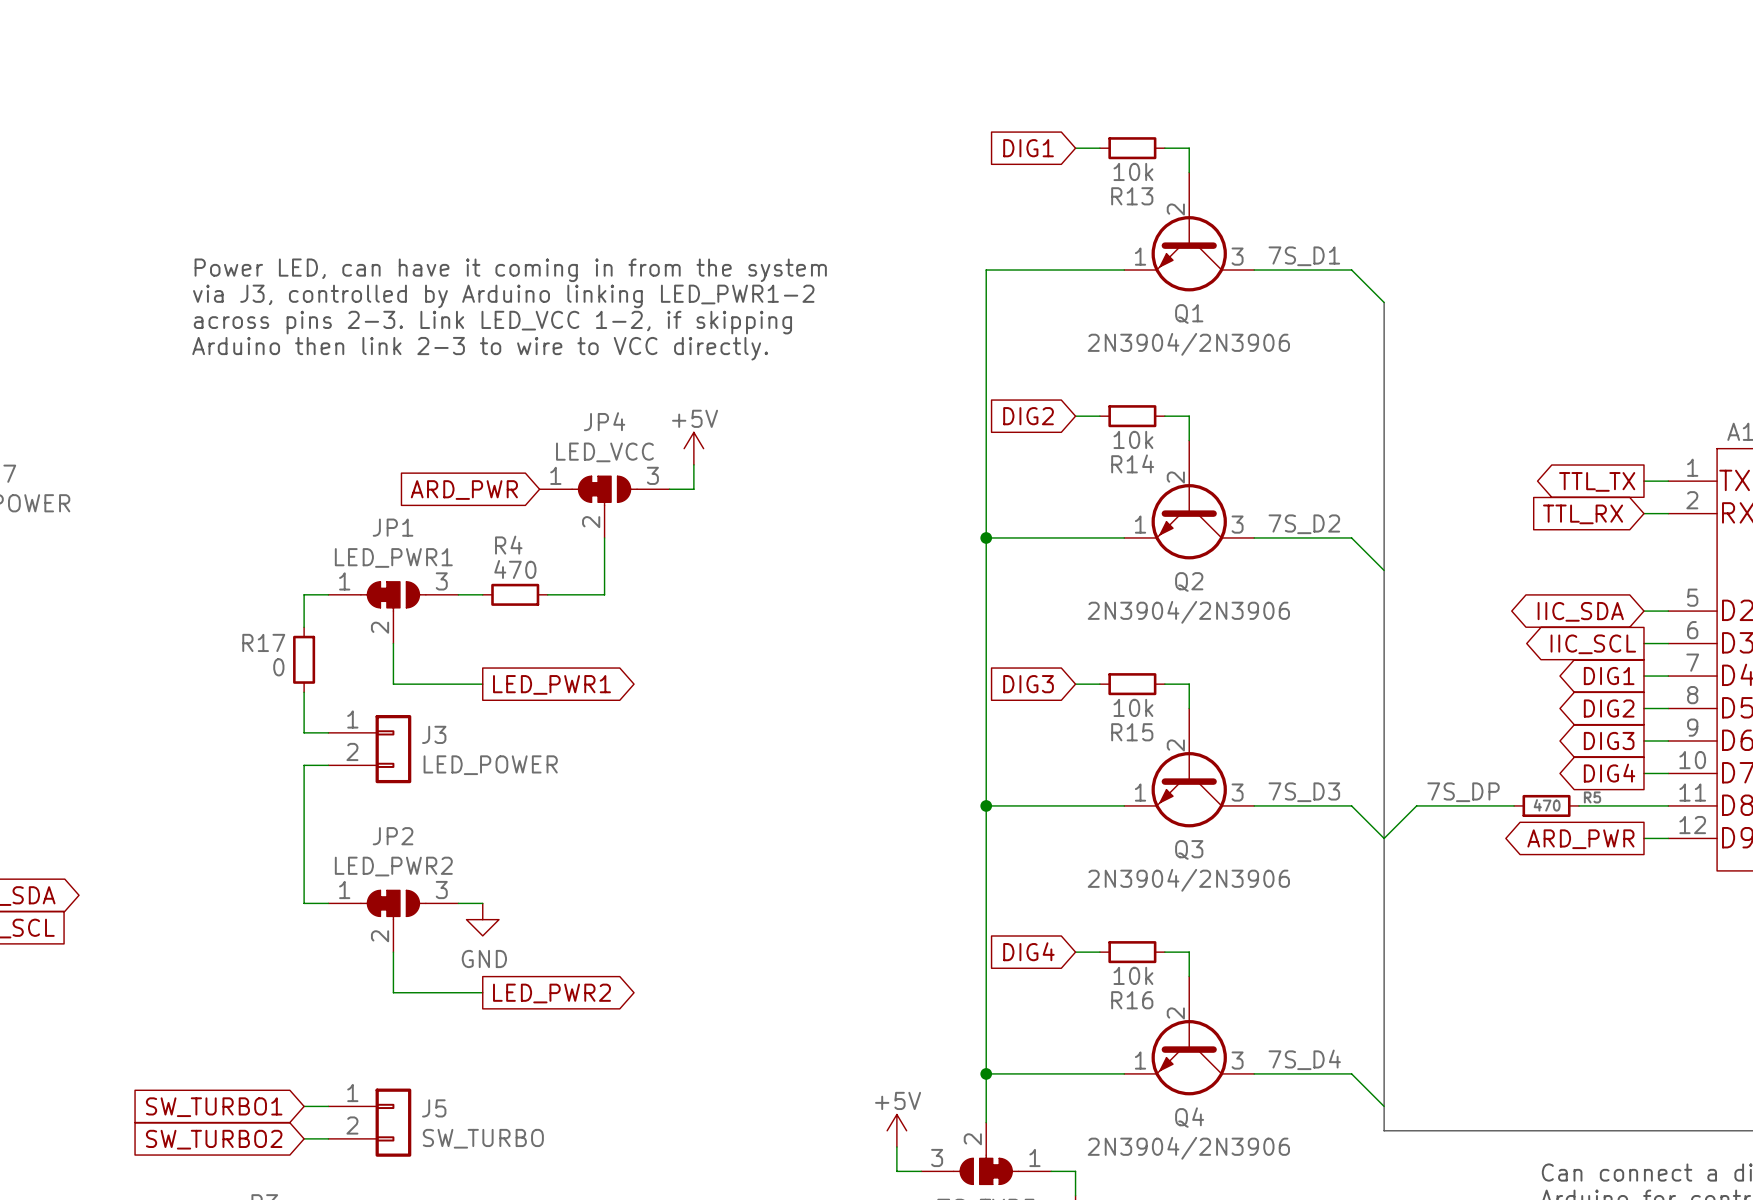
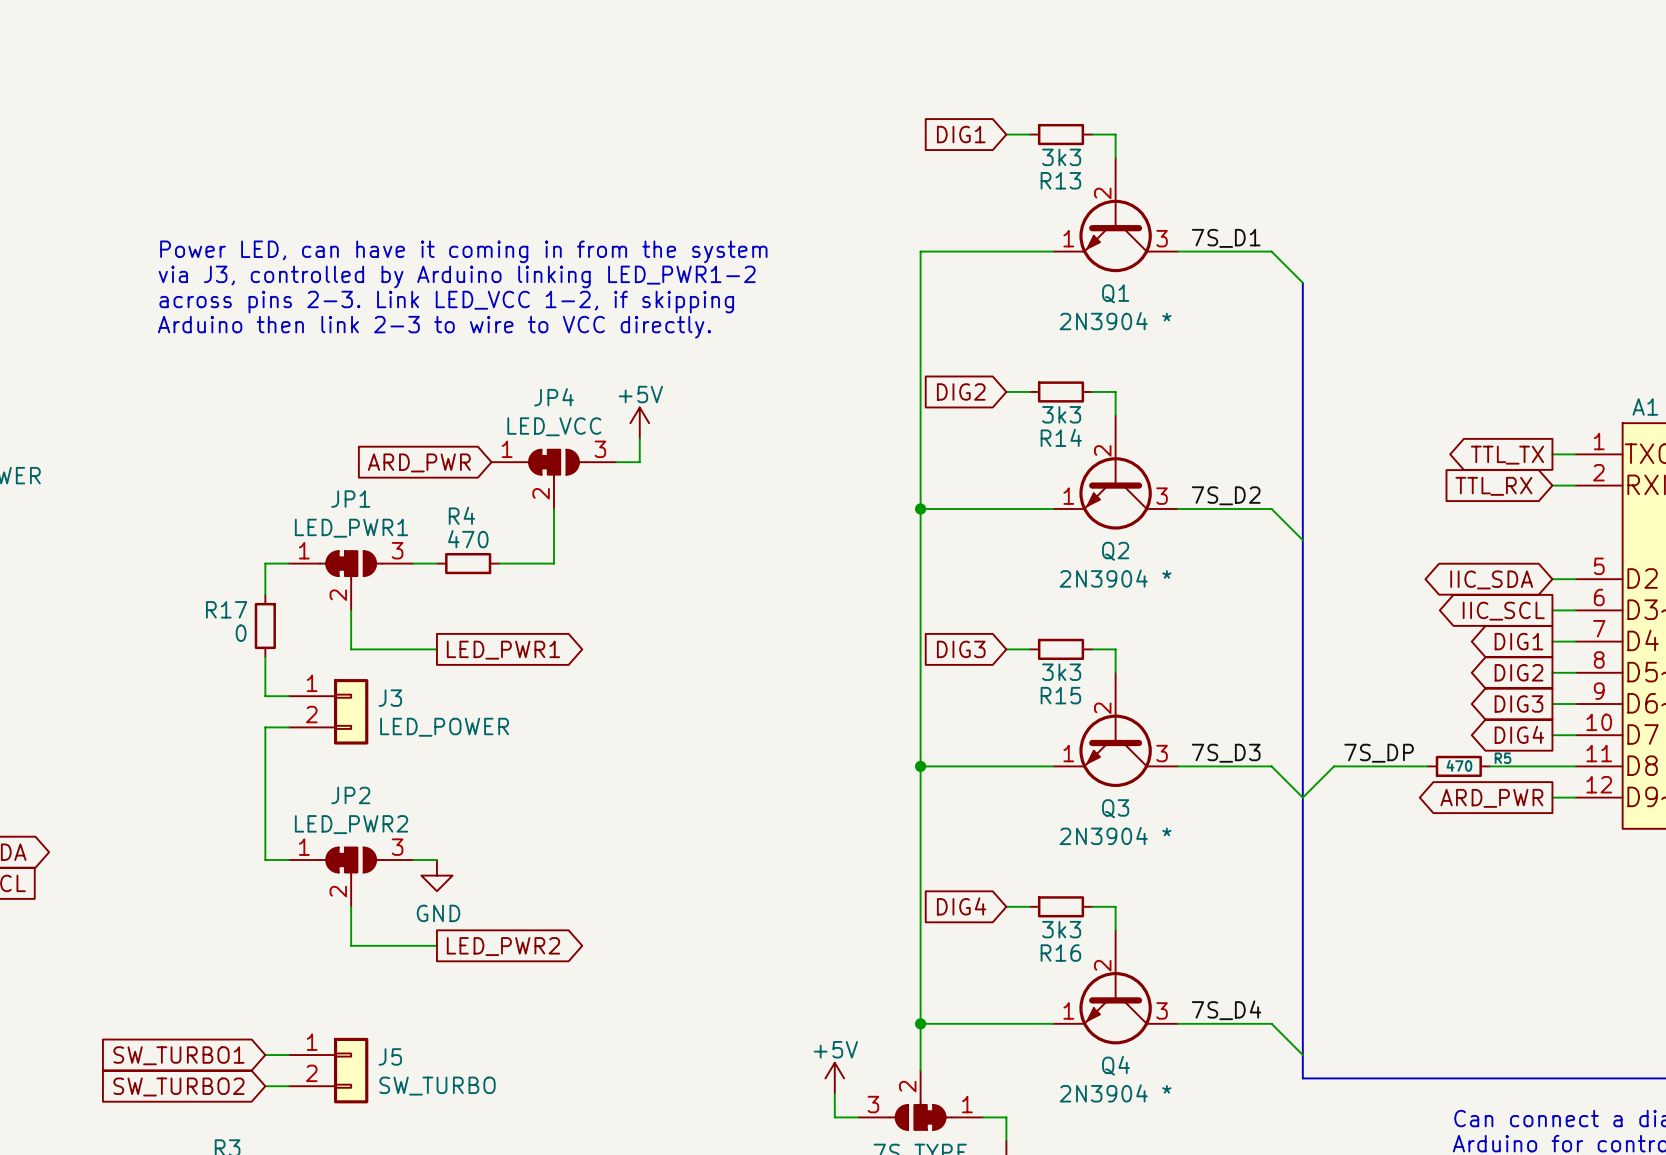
R13 value: 10k (1133, 171) -> 3k3 (1061, 157)
Q1 value: 2N3904/2N3906 (1188, 344) -> 2N3904 * (1115, 321)
R14 value: 10k (1133, 439) -> 3k3 (1061, 414)
Q2 value: 2N3904/2N3906 (1188, 612) -> 2N3904 * (1115, 578)
R15 value: 10k (1133, 707) -> 3k3 (1061, 672)
Q3 value: 2N3904/2N3906 (1188, 880) -> 2N3904 * (1115, 835)
R16 value: 10k (1133, 975) -> 3k3 (1061, 929)
Q4 value: 2N3904/2N3906 (1188, 1148) -> 2N3904 * (1115, 1093)

